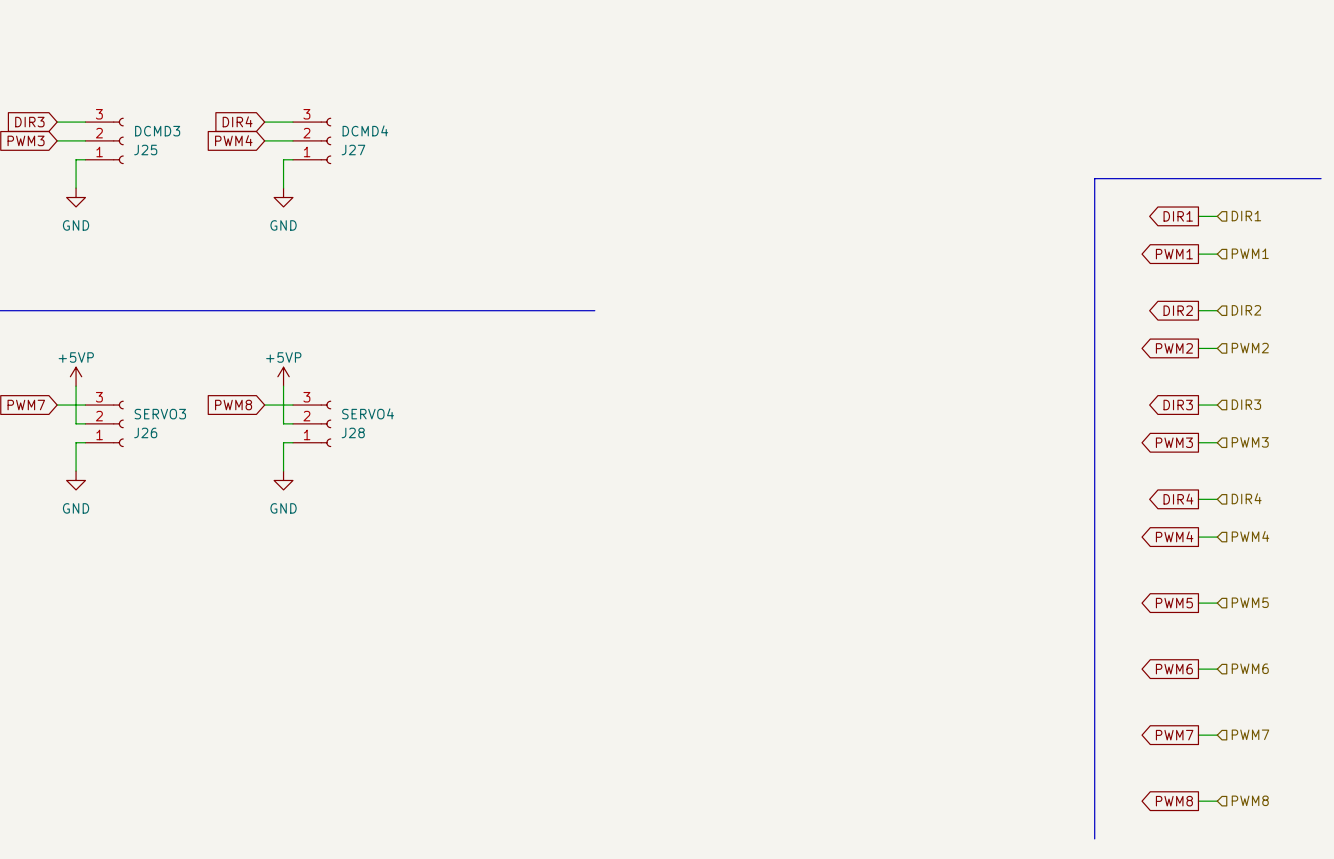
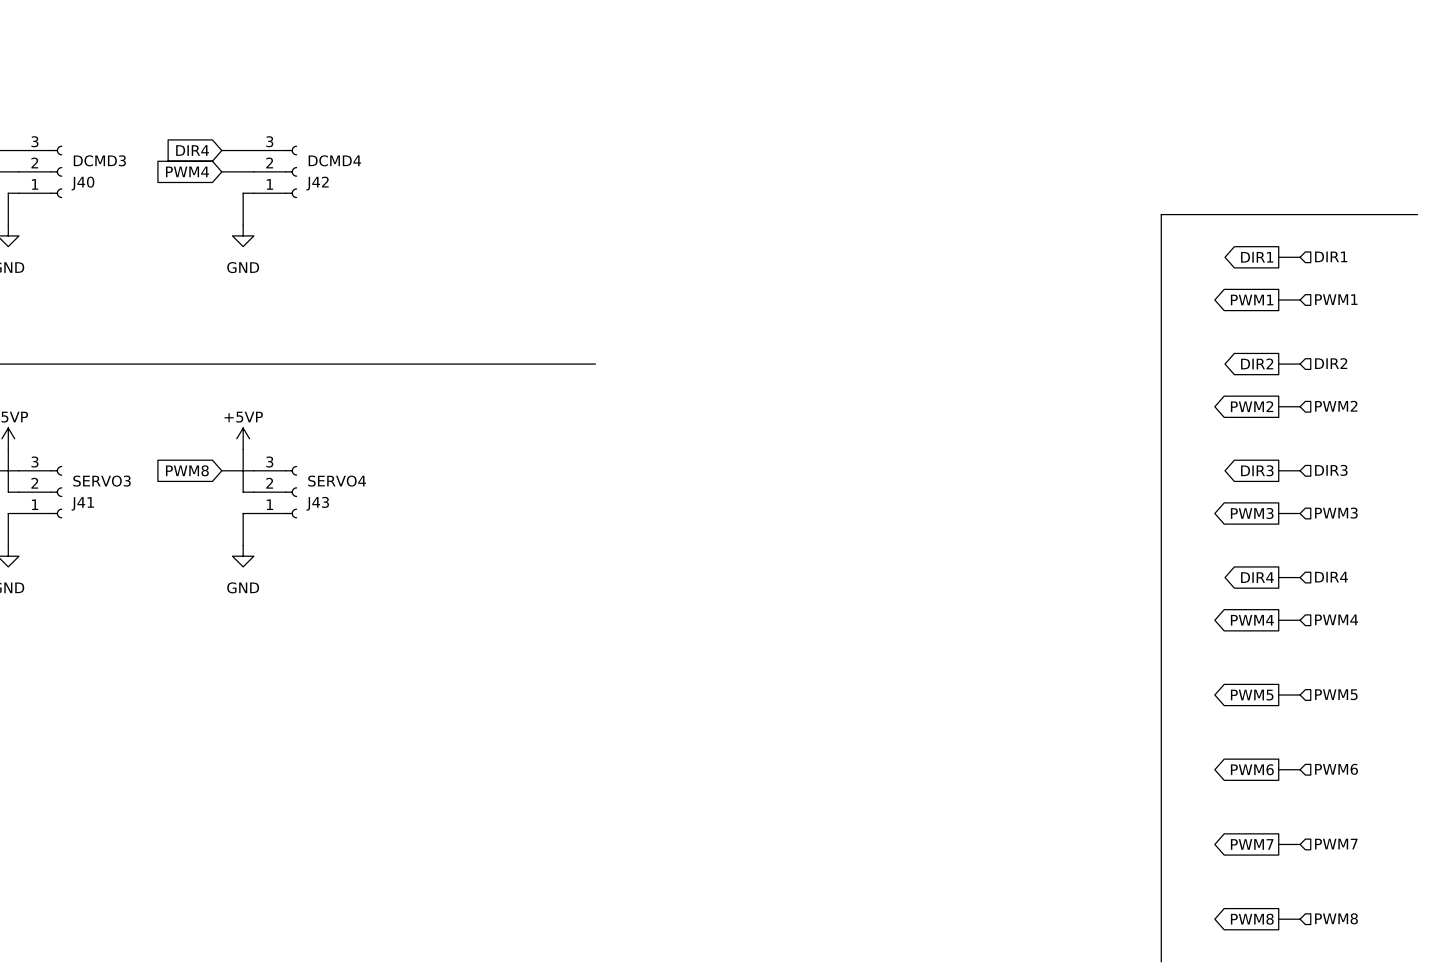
J25 name: J25 (145, 150) -> J40 (82, 183)
J27 name: J27 (353, 150) -> J42 (317, 183)
J26 name: J26 (145, 432) -> J41 (82, 503)
J28 name: J28 (353, 432) -> J43 (317, 503)

